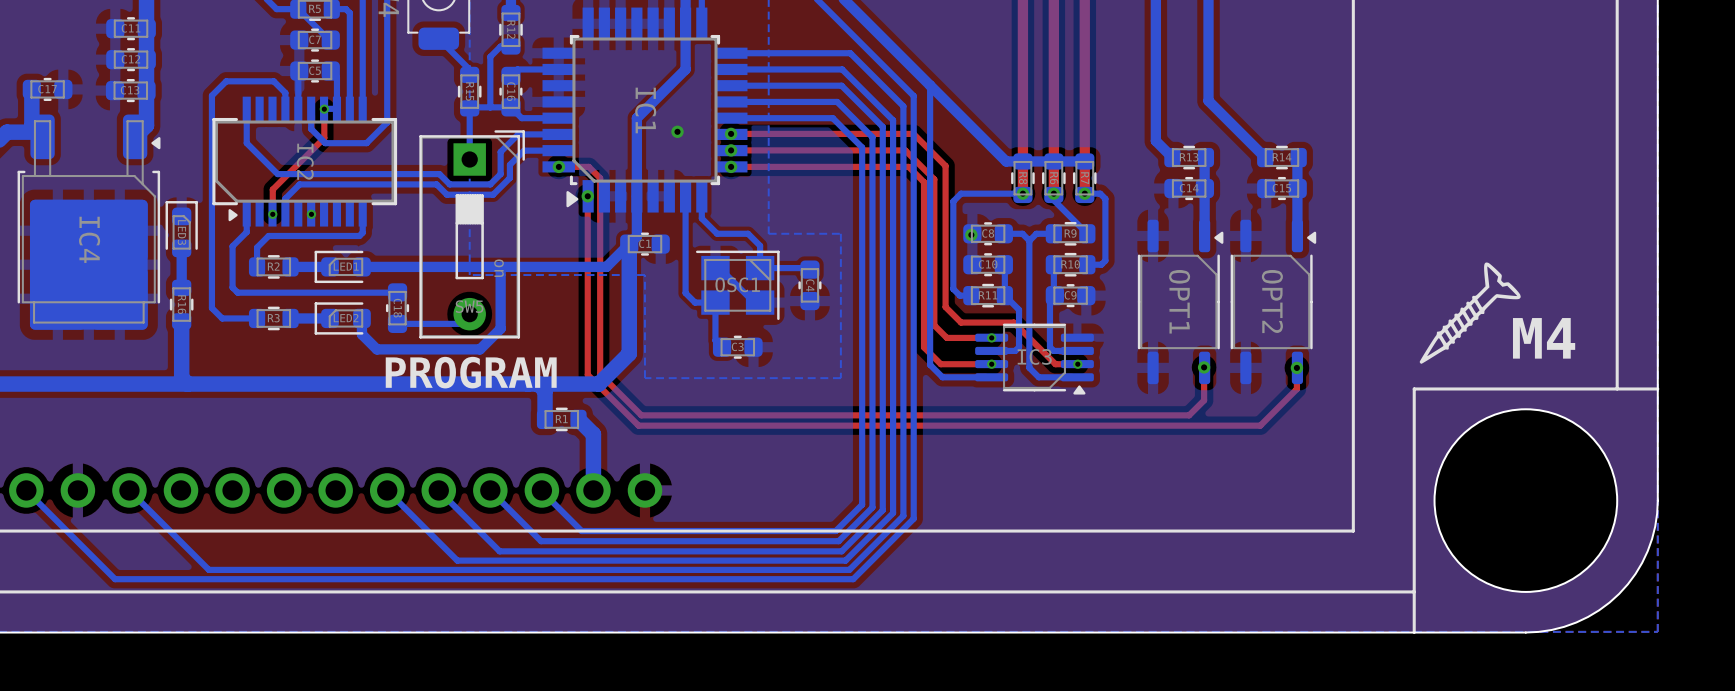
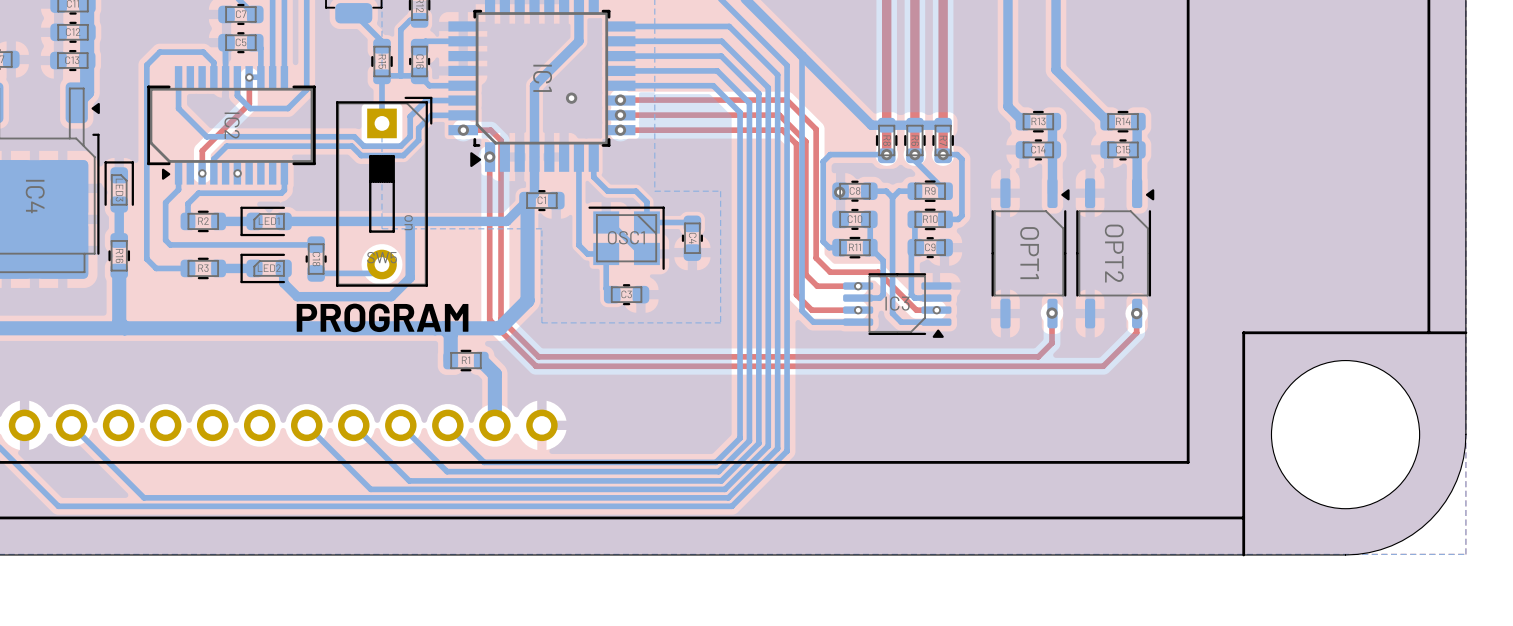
drawing: [1419, 262, 1521, 364] -> none
text: M4 (1544, 338) -> none
round board edge size: [1434, 408, 1618, 593] -> [1271, 360, 1421, 510]

